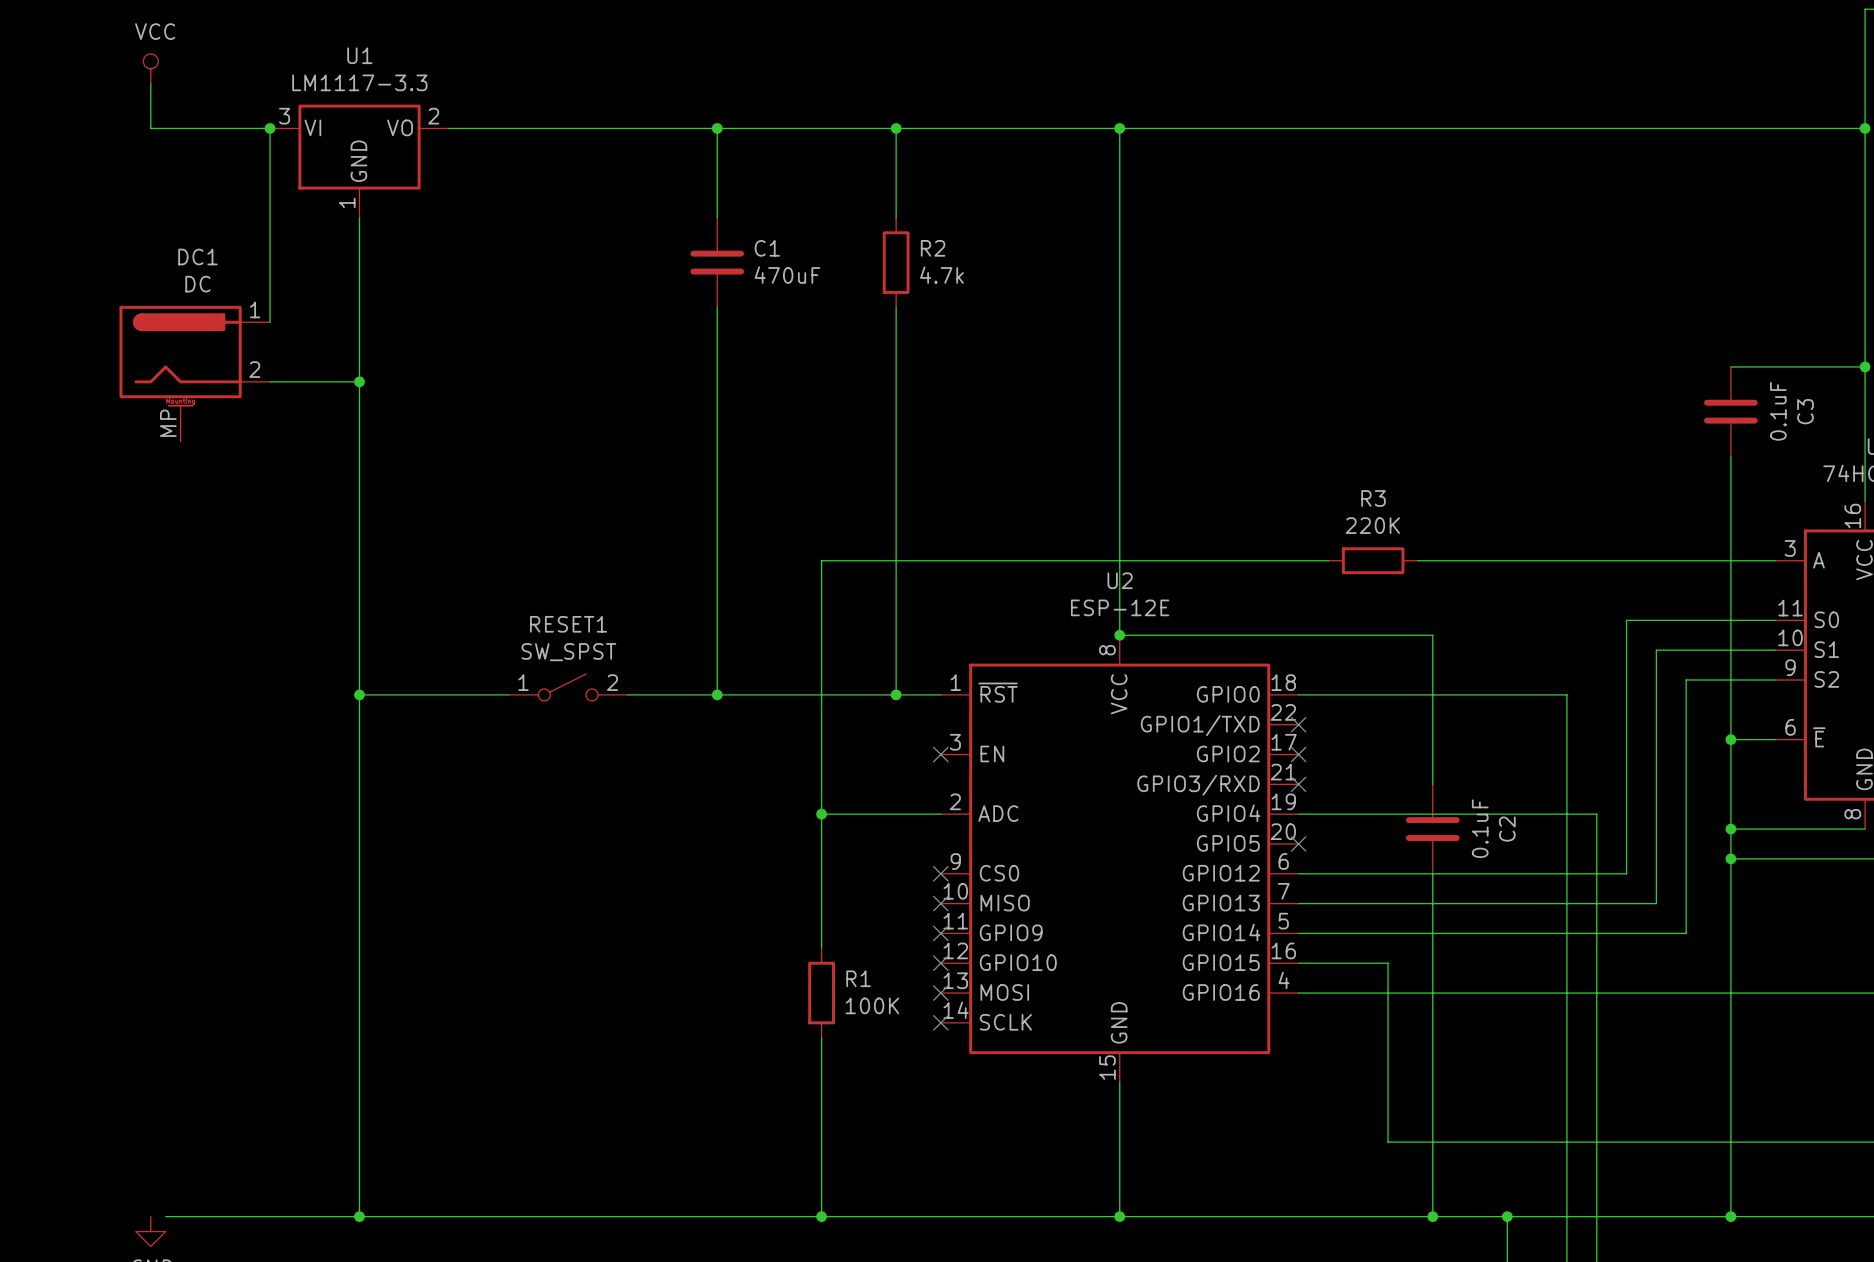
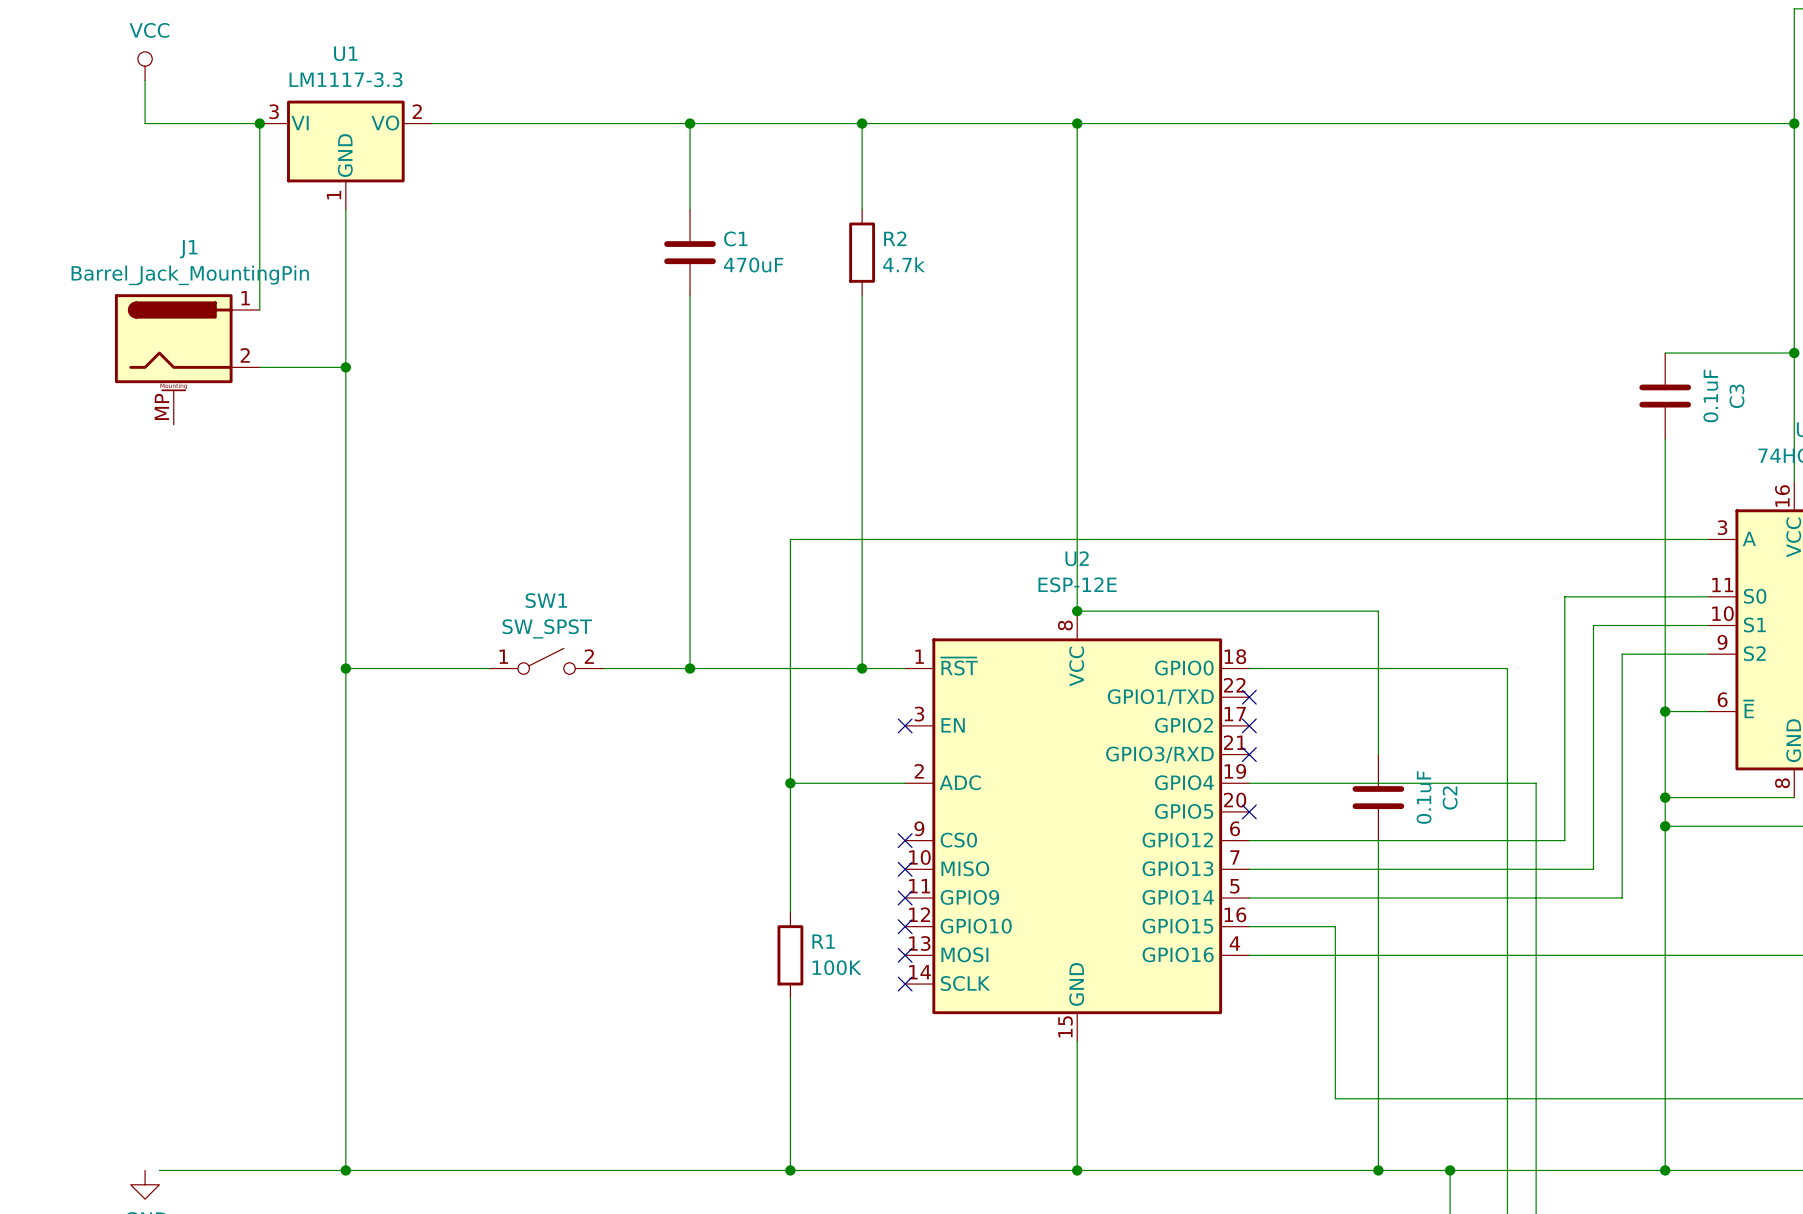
DC1 name: DC1 (197, 256) -> J1 (188, 249)
DC1 value: DC (197, 284) -> Barrel_Jack_MountingPin (190, 275)
wire: none -> (1278, 539) (1364, 539)
R3: 220K (1373, 560) -> none
RESET1 name: RESET1 (568, 624) -> SW1 (546, 600)

